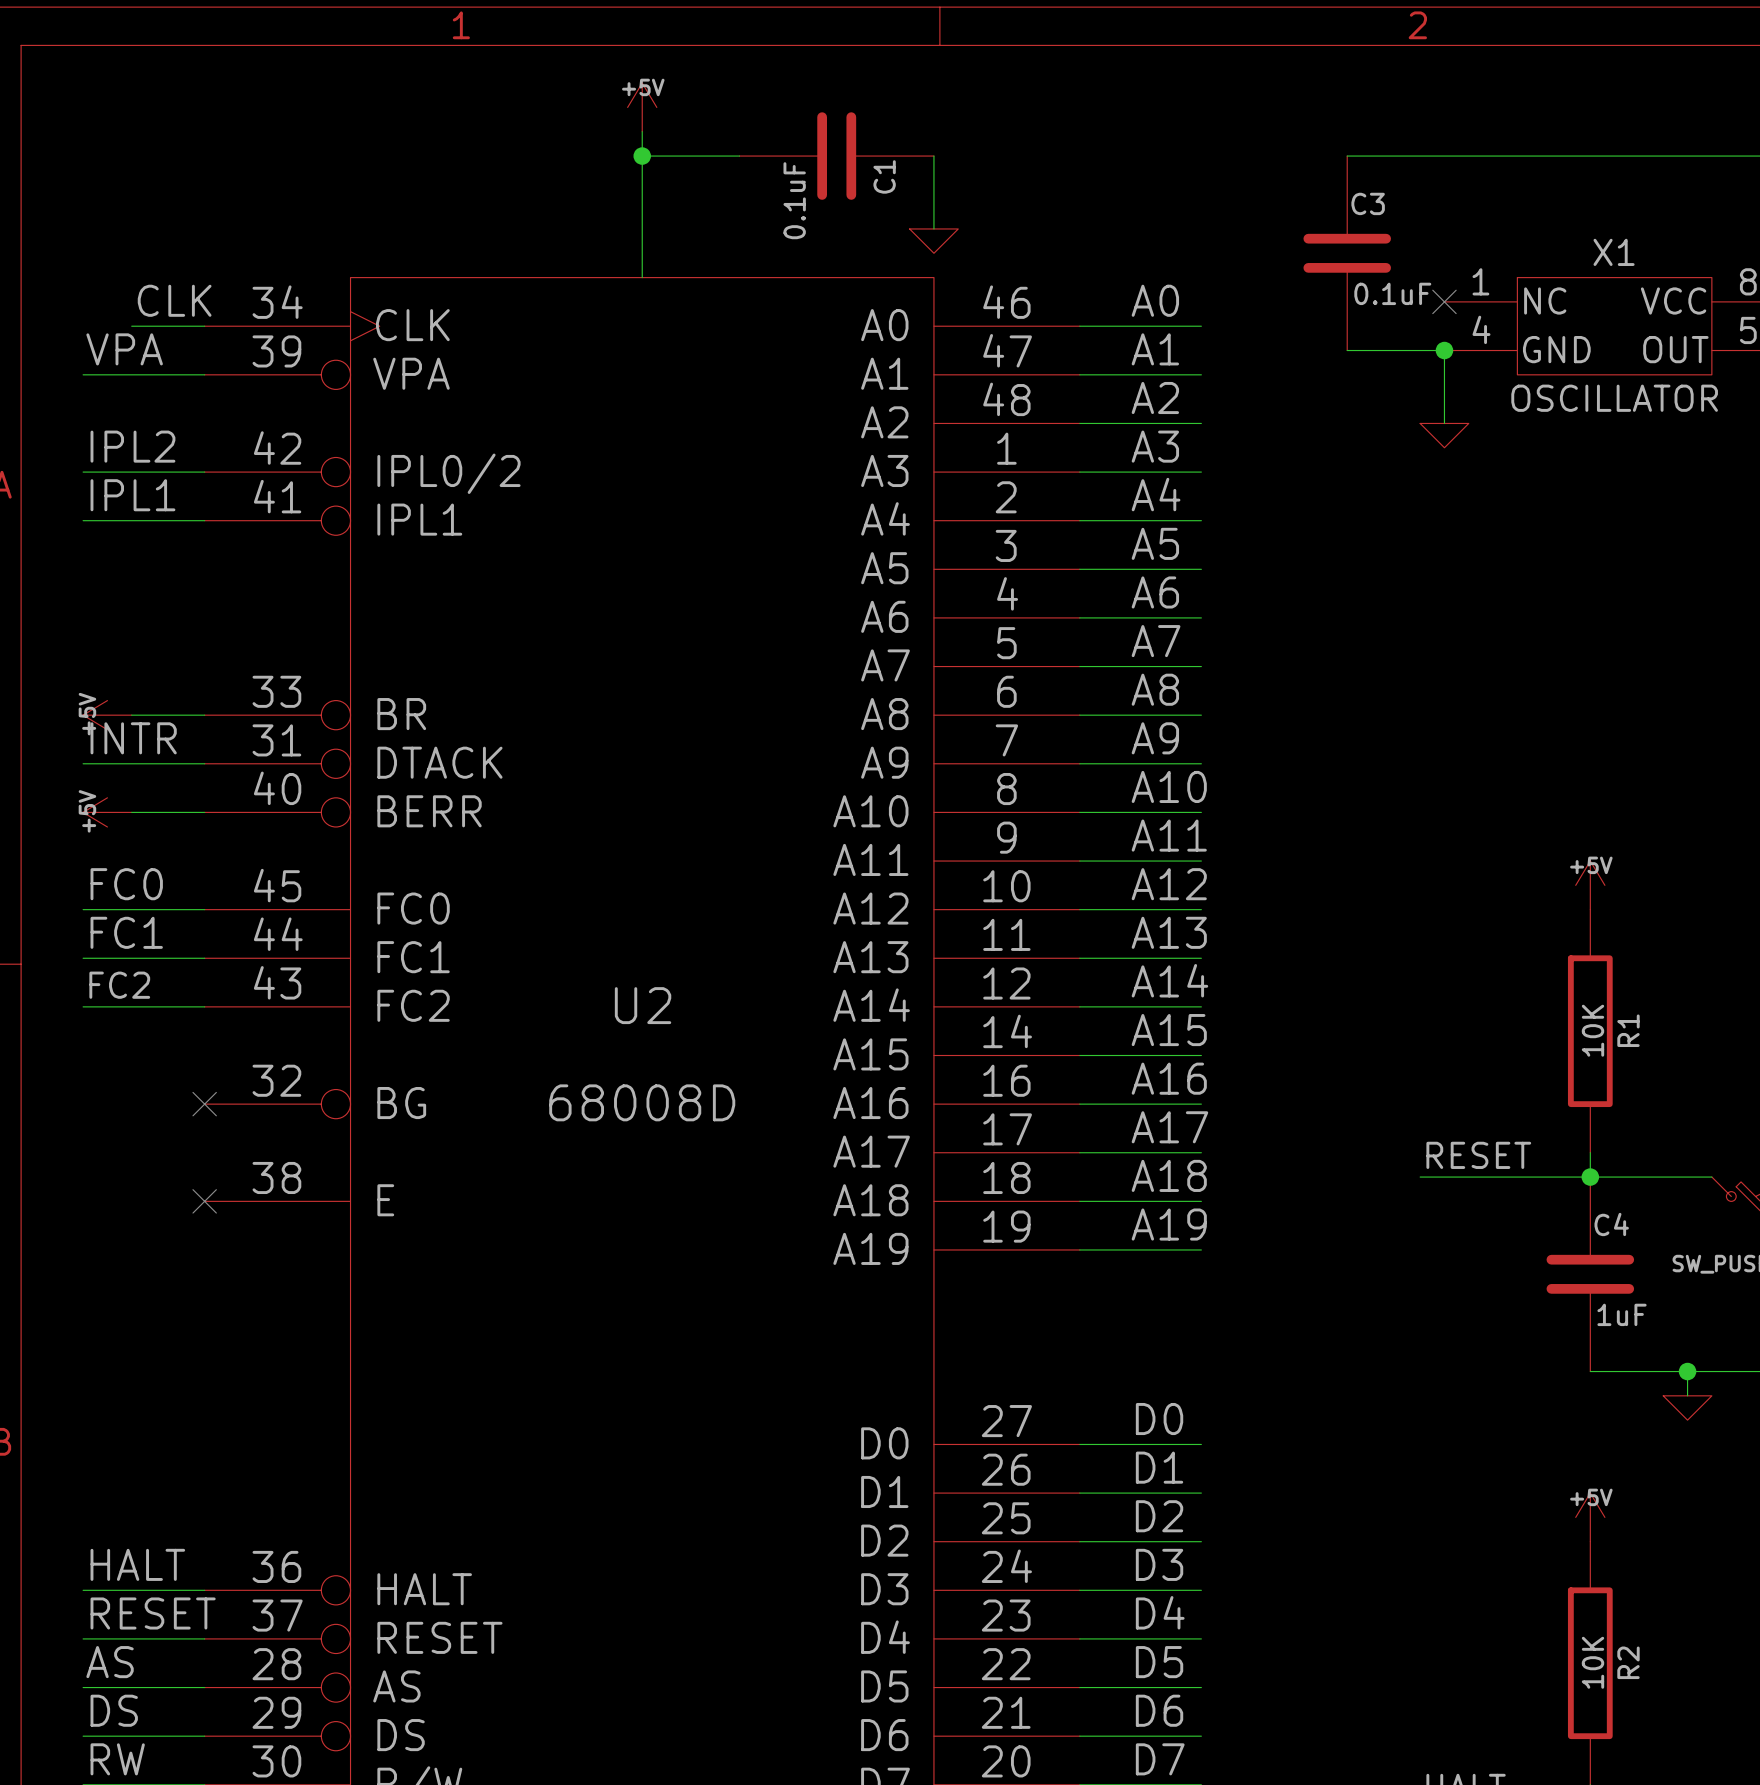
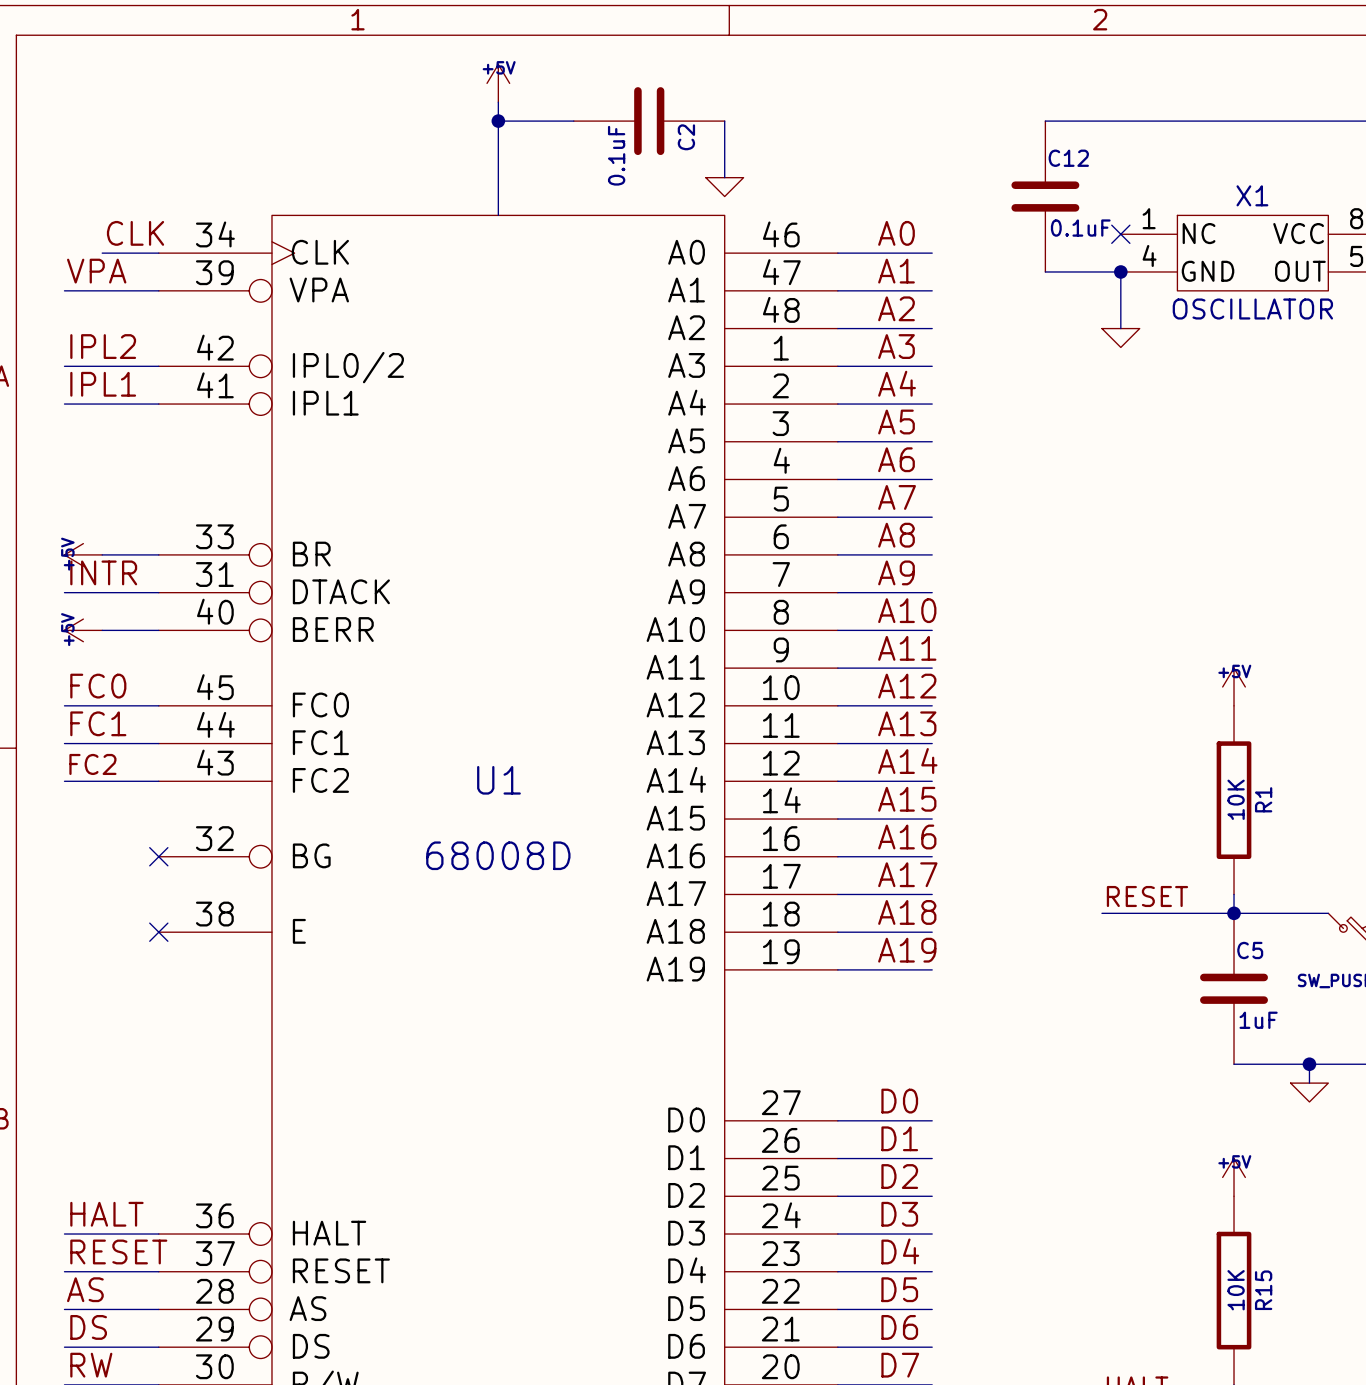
C1 name: C1 (884, 176) -> C2 (686, 137)
C3 name: C3 (1368, 203) -> C12 (1068, 158)
U2 name: U2 (643, 1005) -> U1 (498, 780)
C4 name: C4 (1611, 1224) -> C5 (1250, 950)
R2 name: R2 (1628, 1662) -> R15 (1263, 1290)

